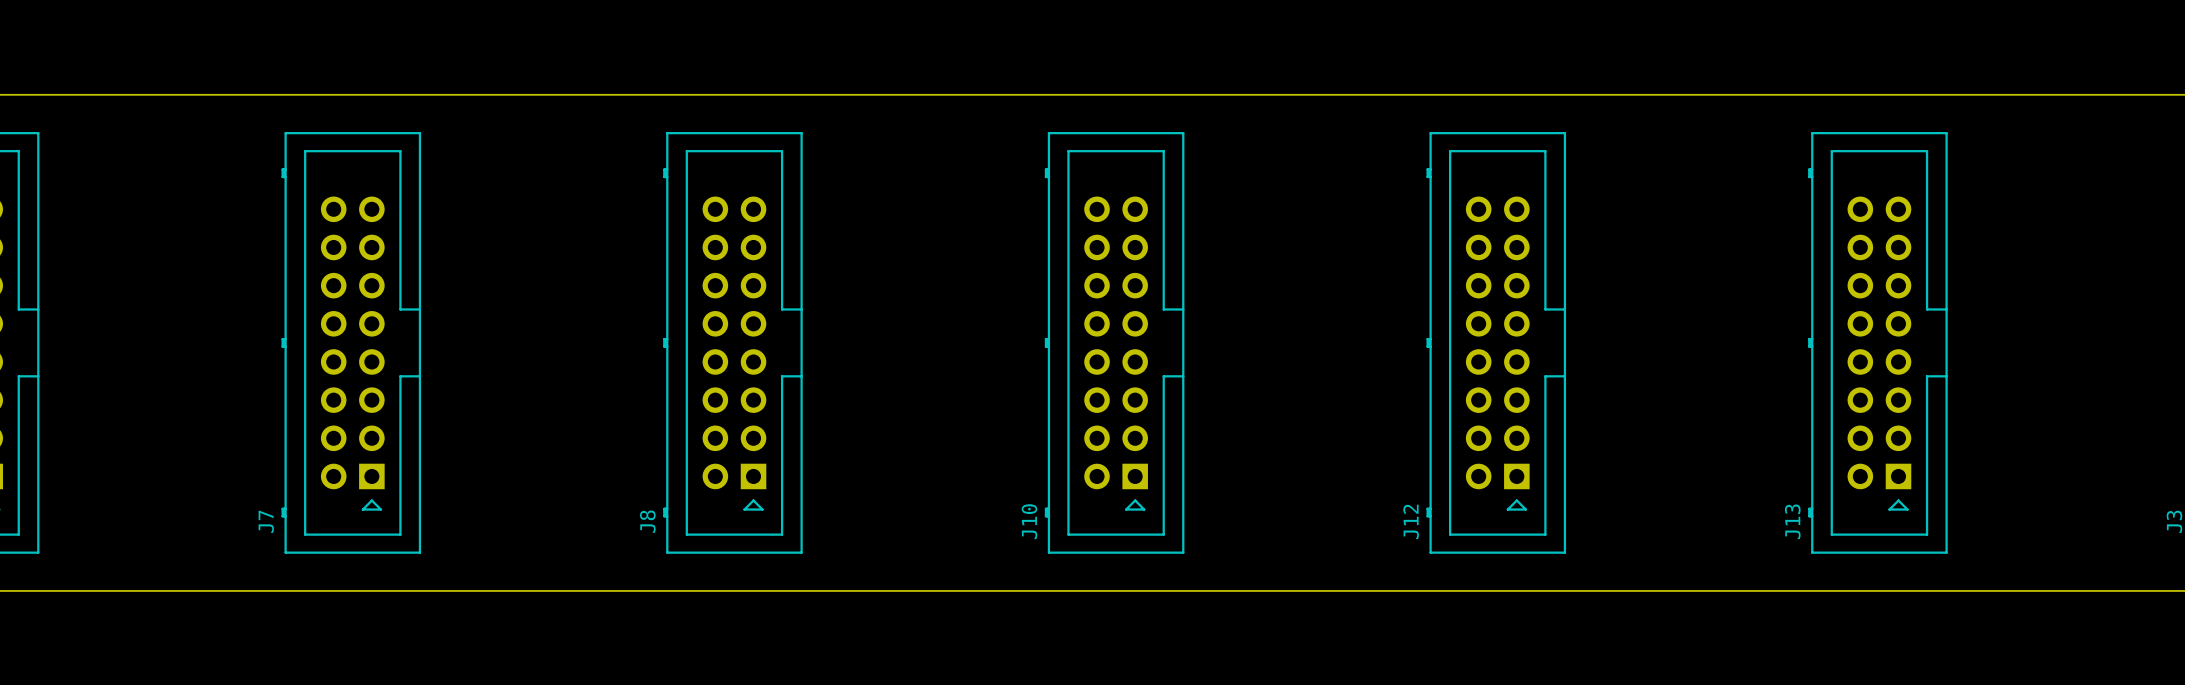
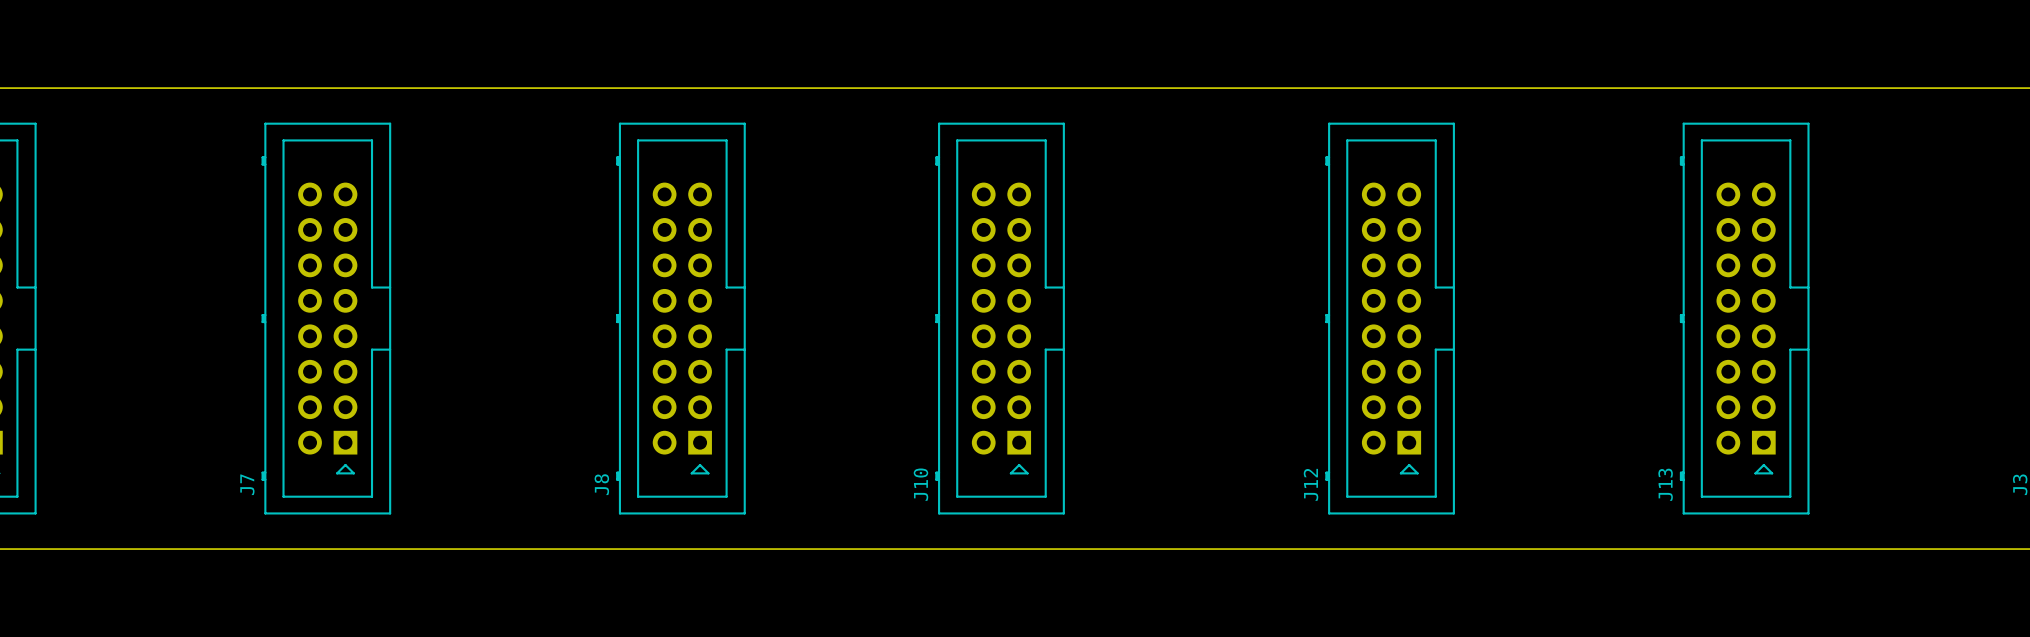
J10 position: (1114, 342) -> (1000, 318)

